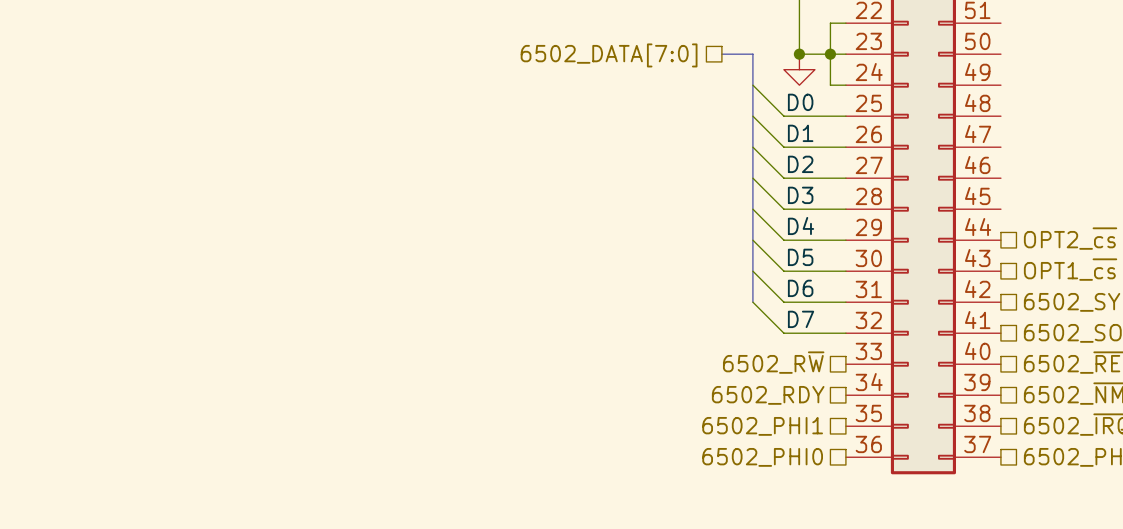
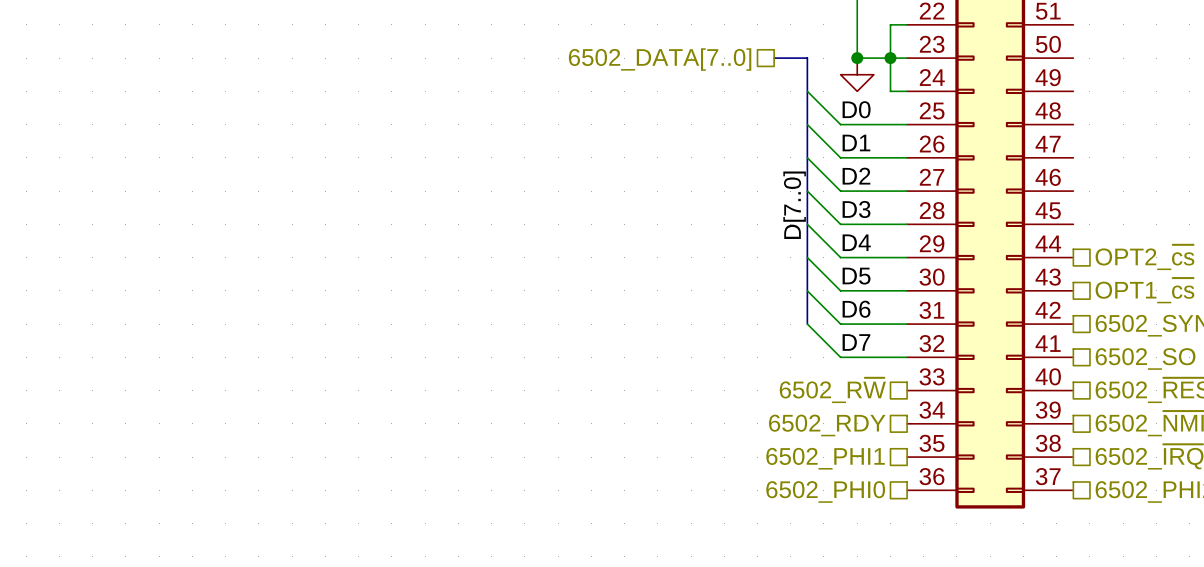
hierarchical label: 6502_DATA[7:0] (609, 55) -> 6502_DATA[7..0] (660, 59)
label: none -> D[7..0] (794, 205)

